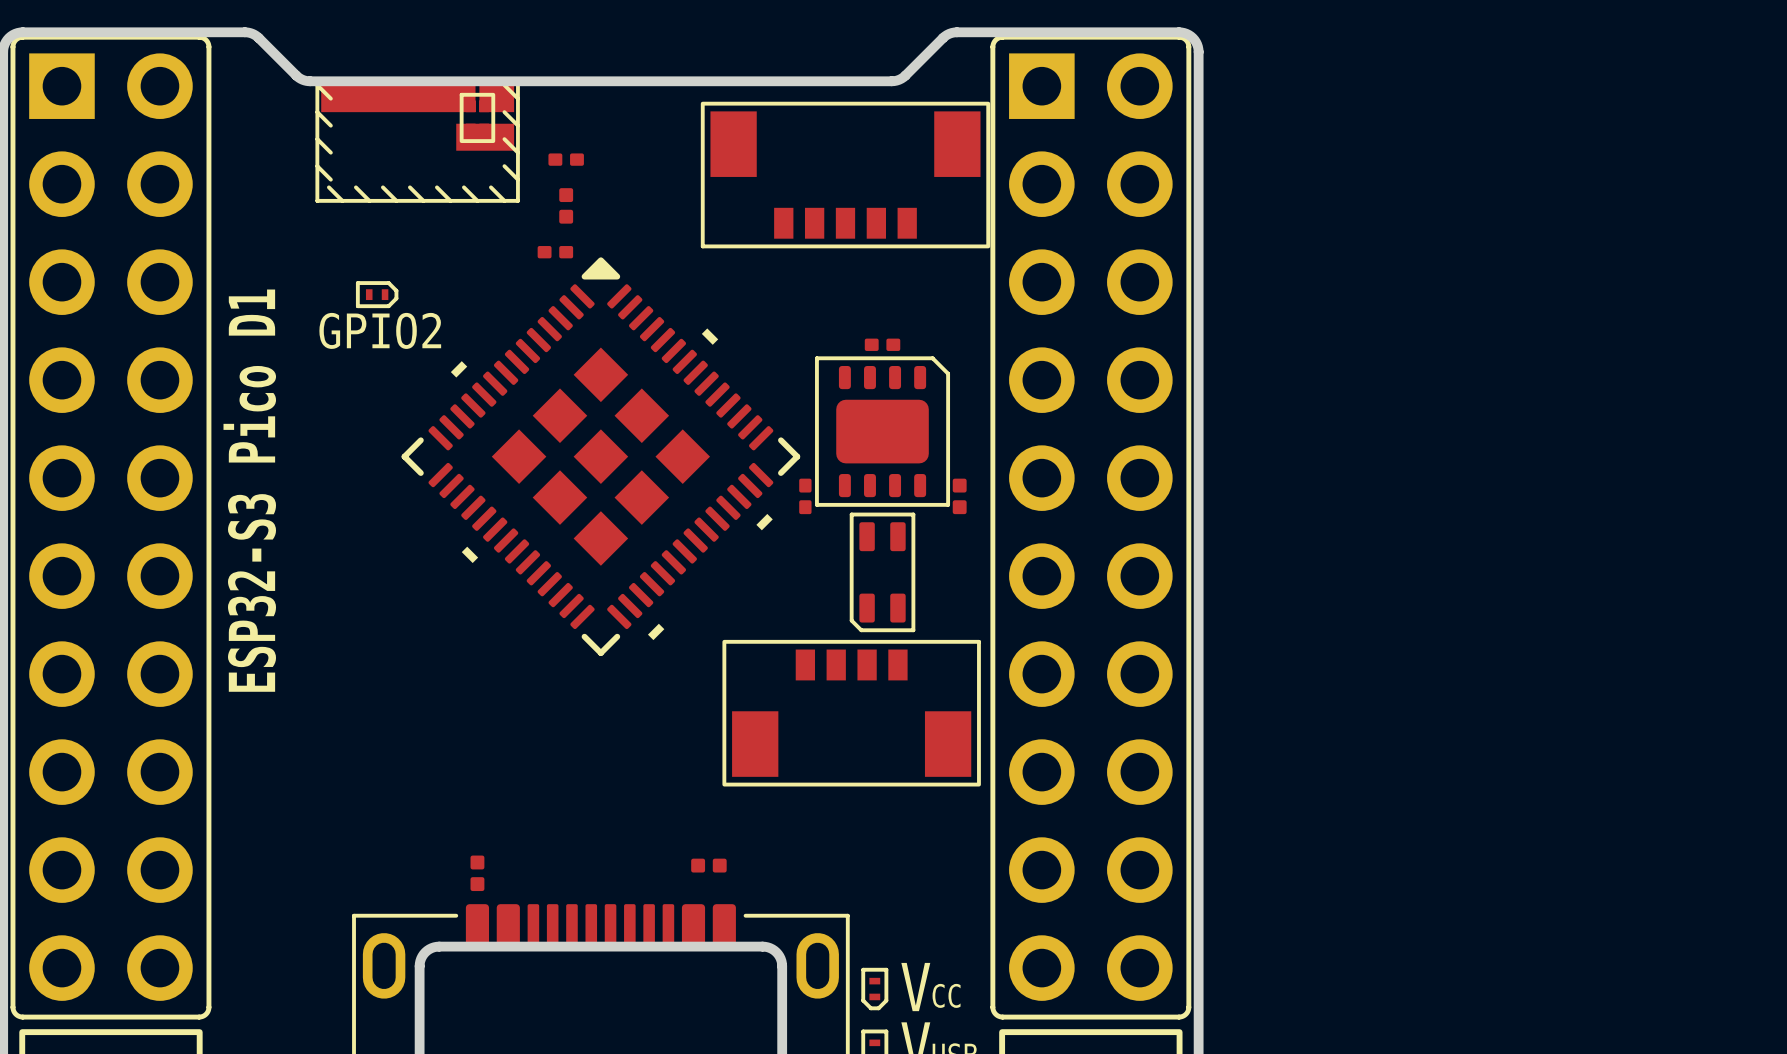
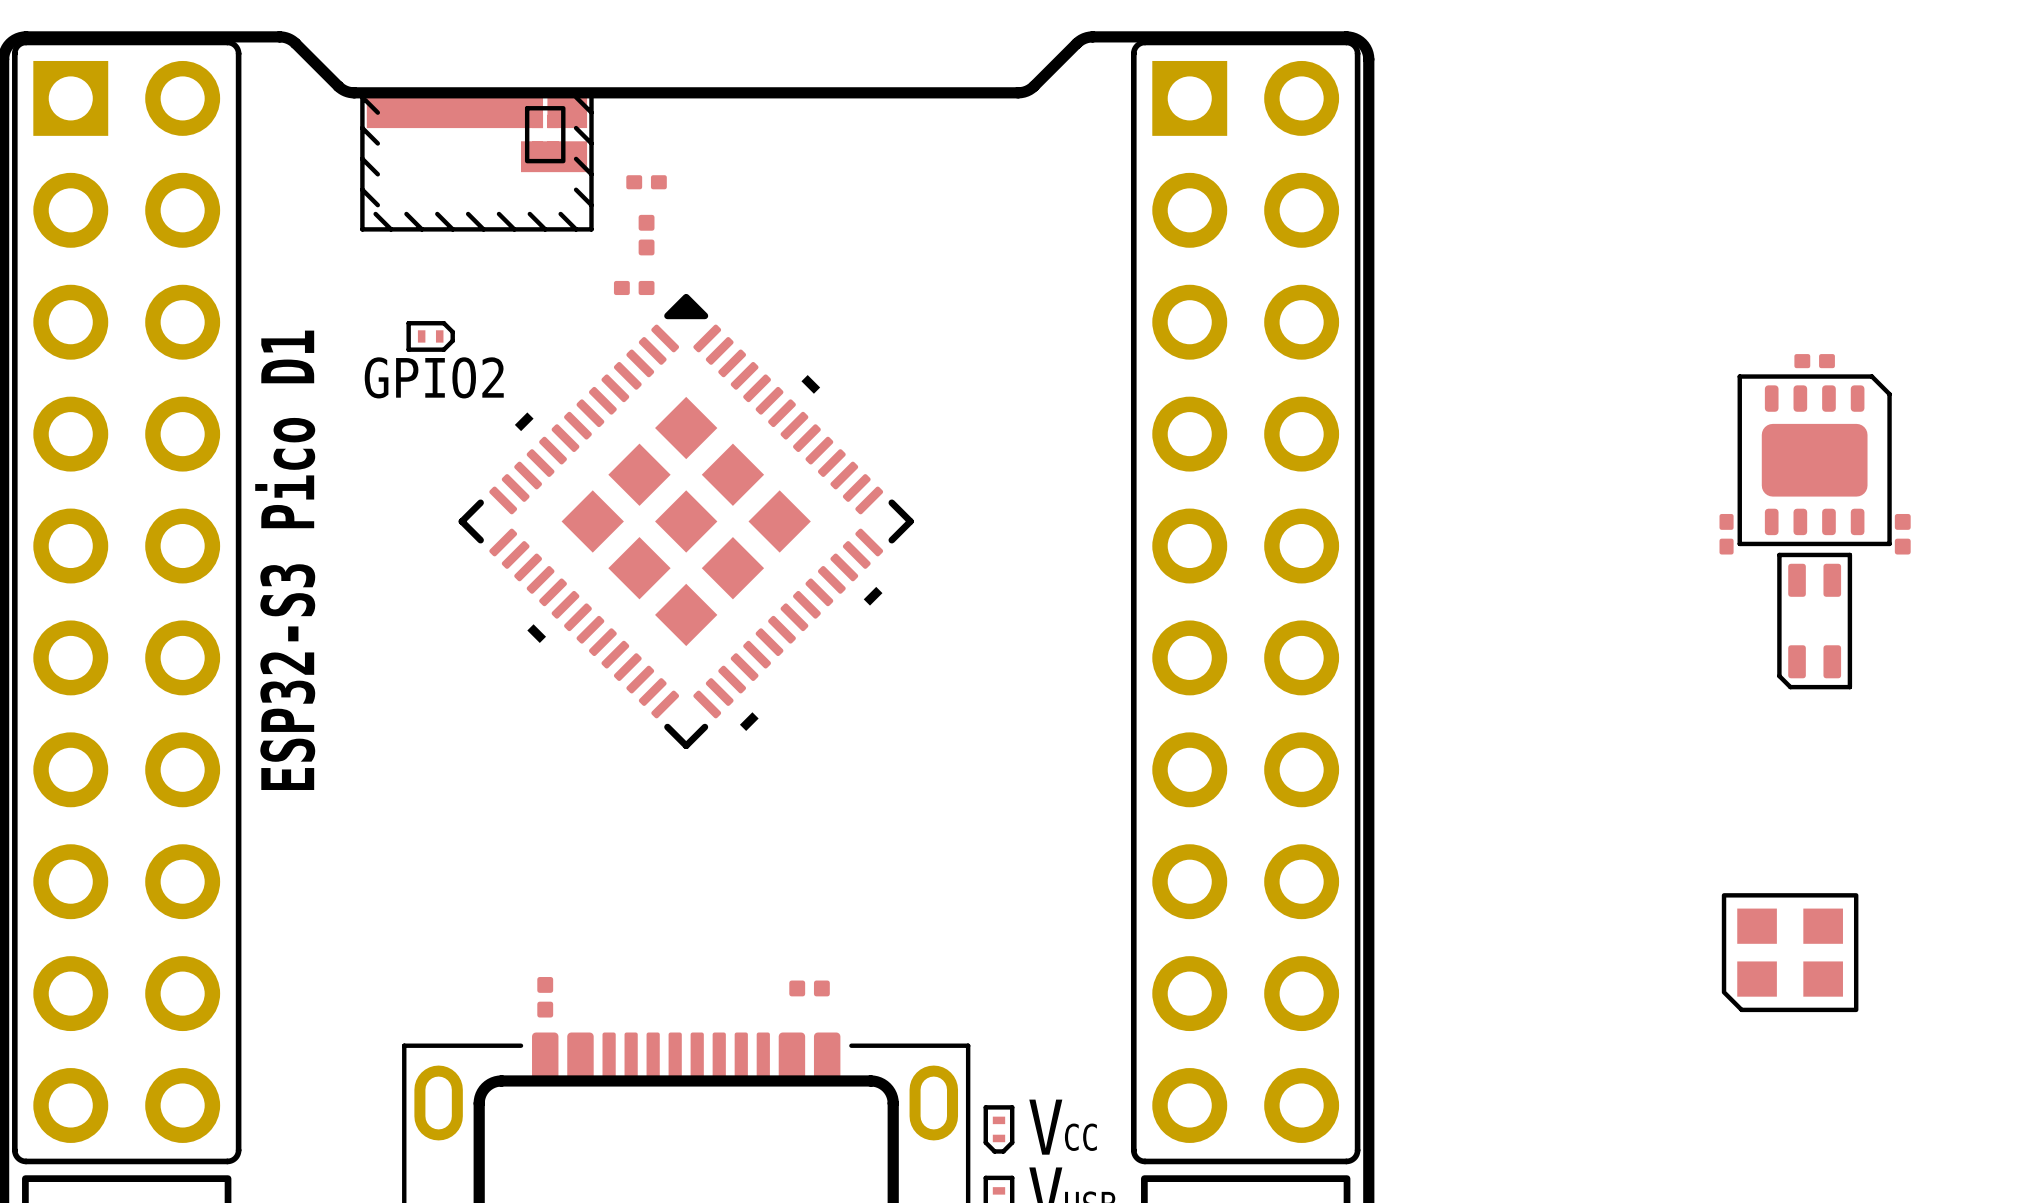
part: (845, 175) -> none
part: none -> (1814, 361)
part: (882, 344) -> none
part position: (882, 431) -> (1814, 460)
part: none -> (1726, 534)
part: (805, 496) -> none
part position: (959, 496) -> (1902, 534)
part position: (882, 572) -> (1814, 621)
part: (851, 713) -> none
part: none -> (1790, 952)

